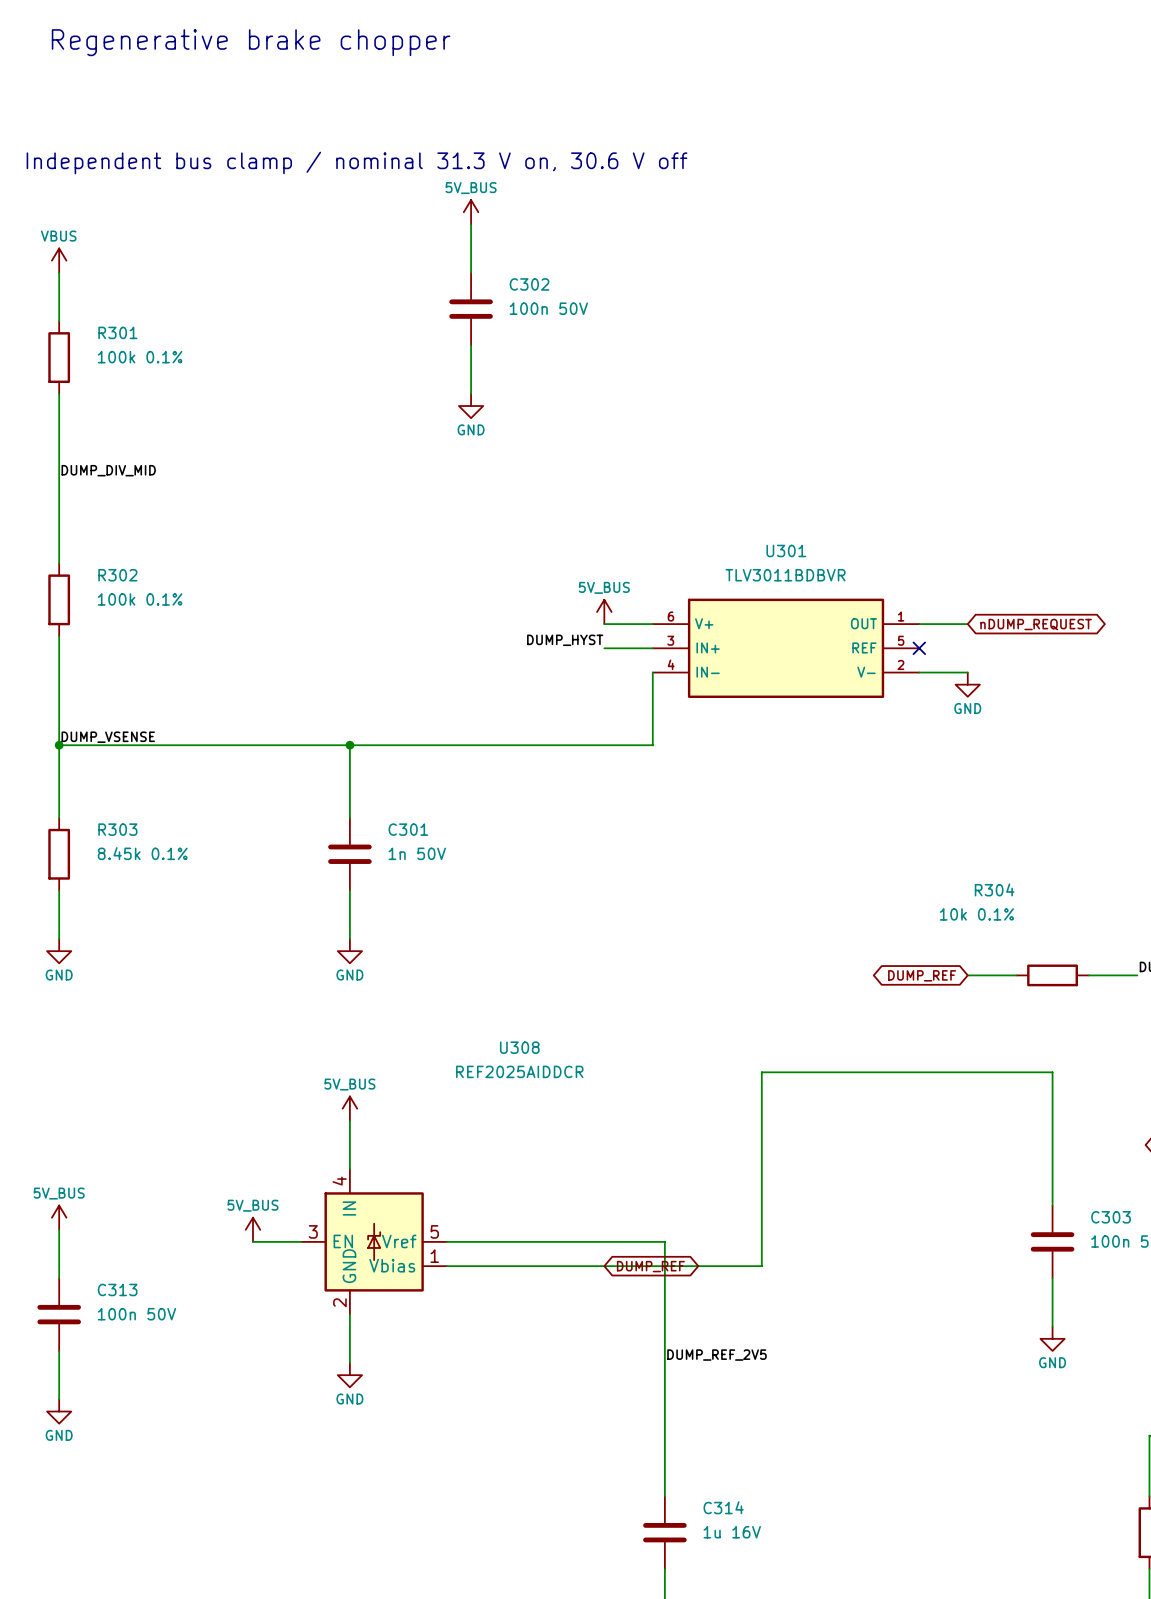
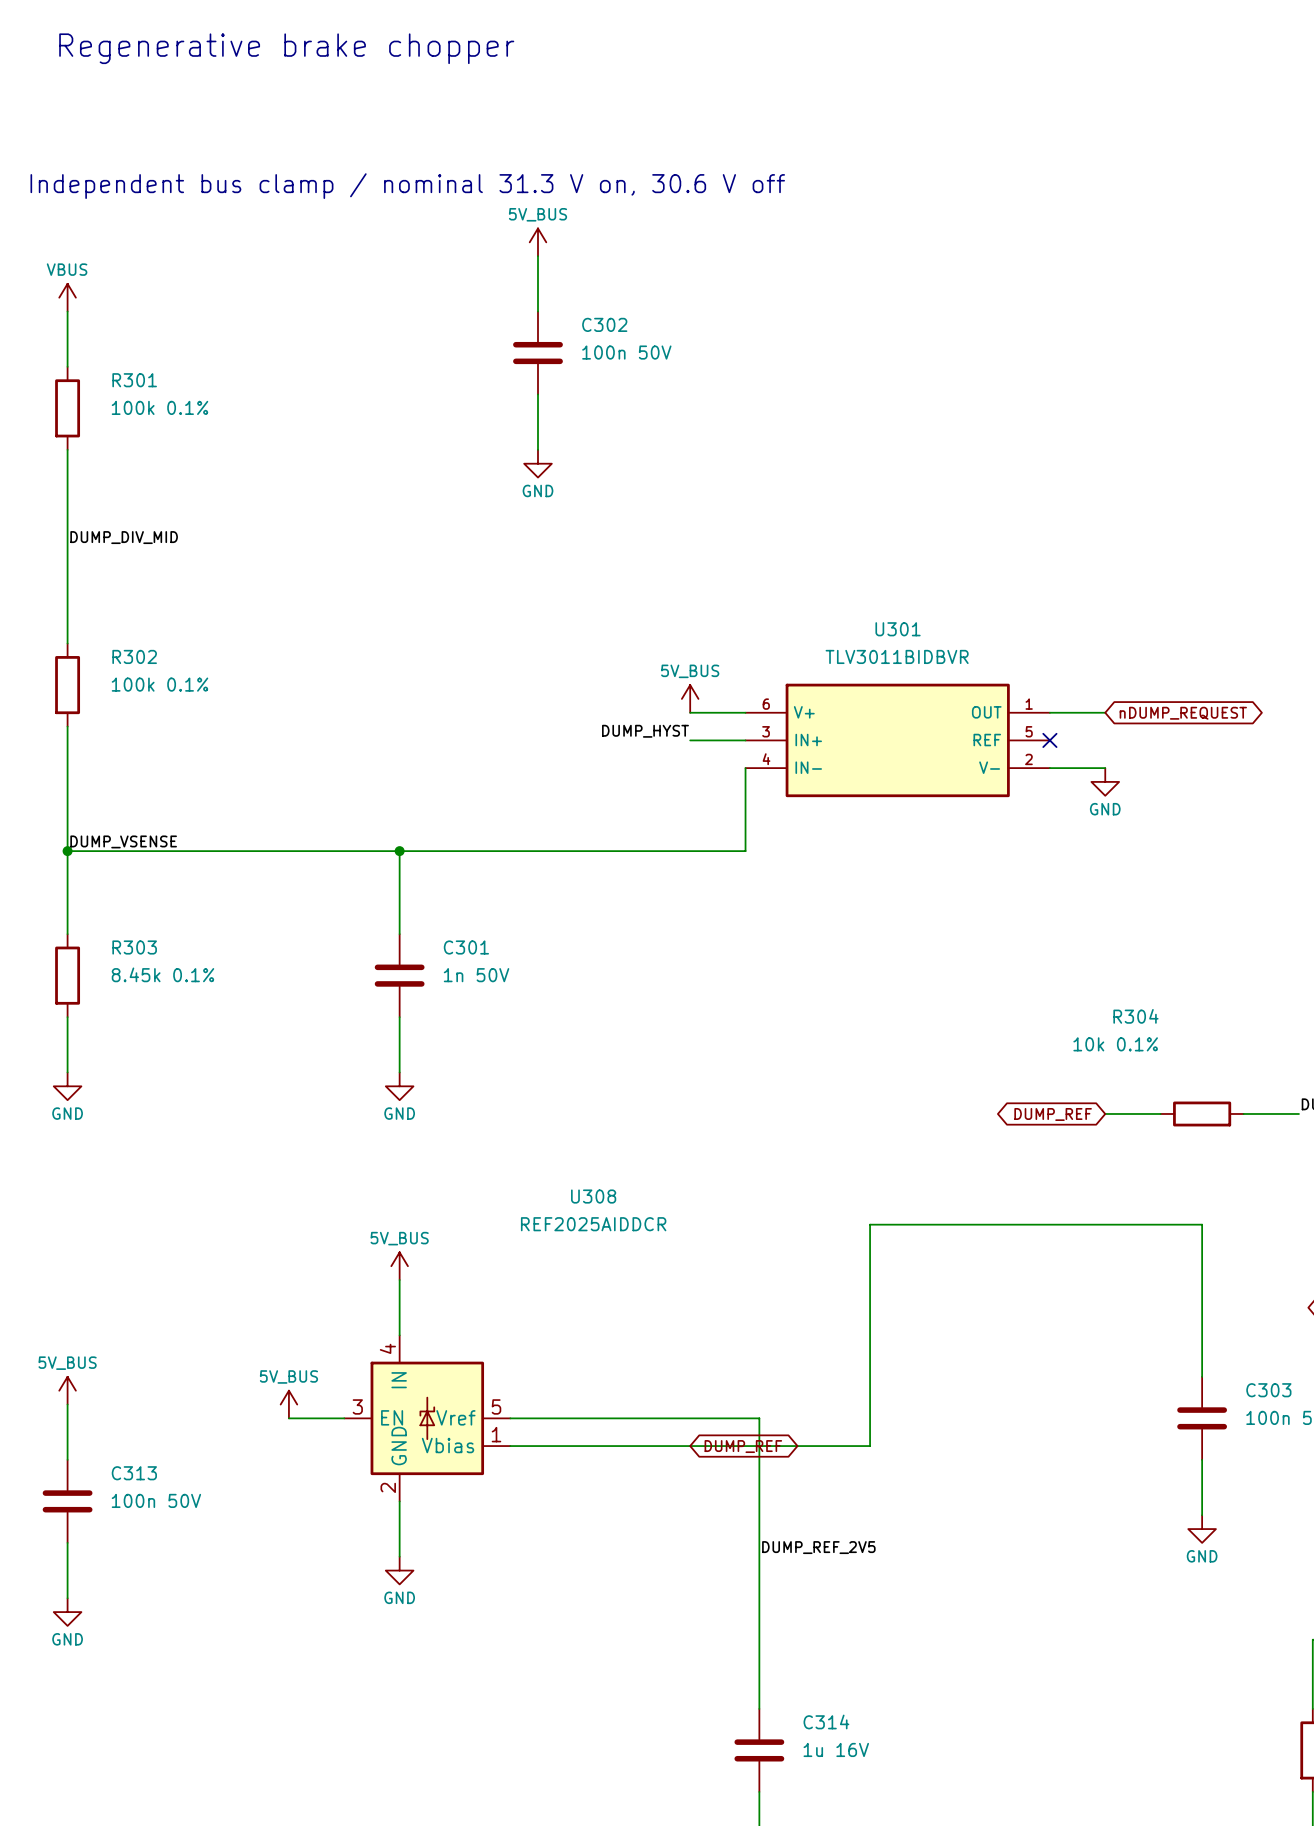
U301 value: TLV3011BDBVR (785, 575) -> TLV3011BIDBVR (897, 656)

